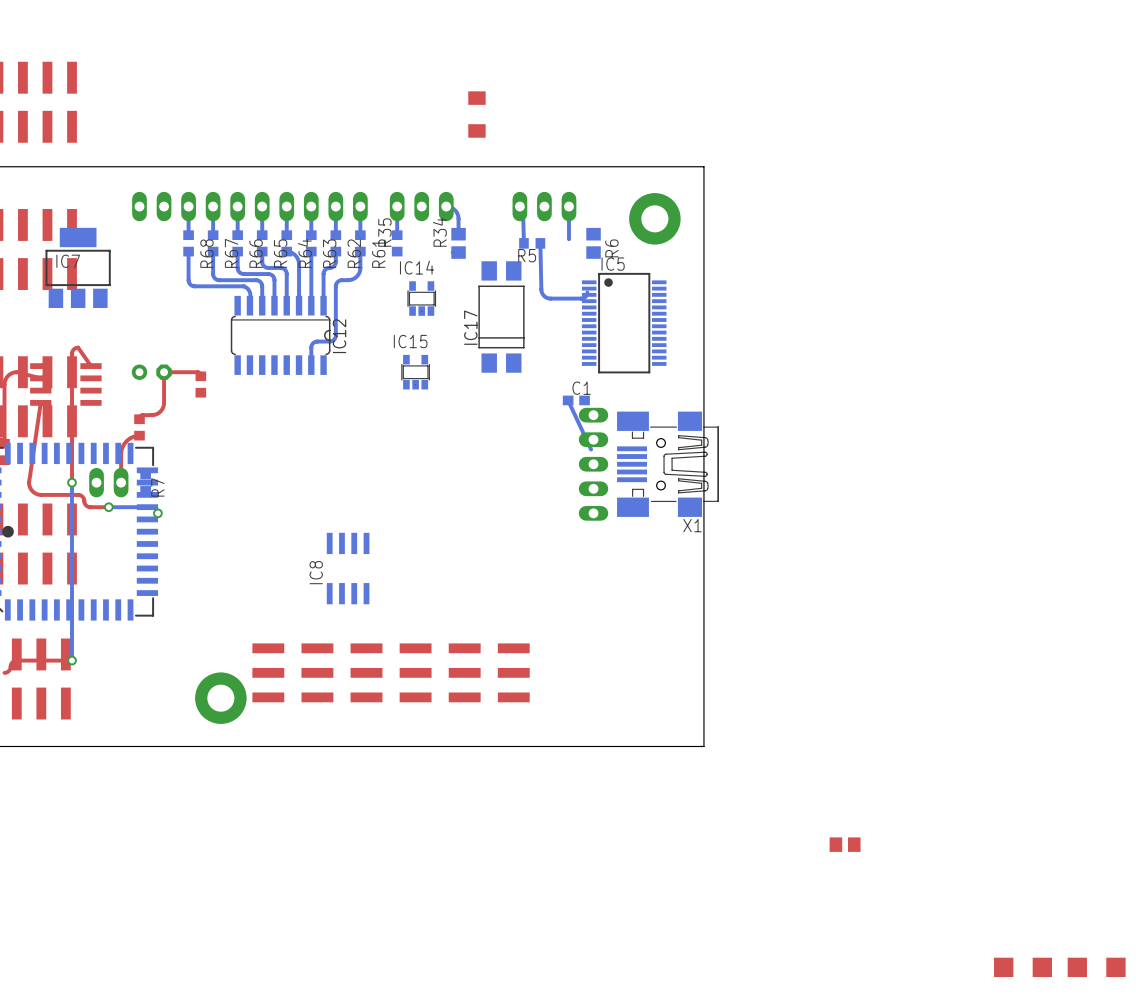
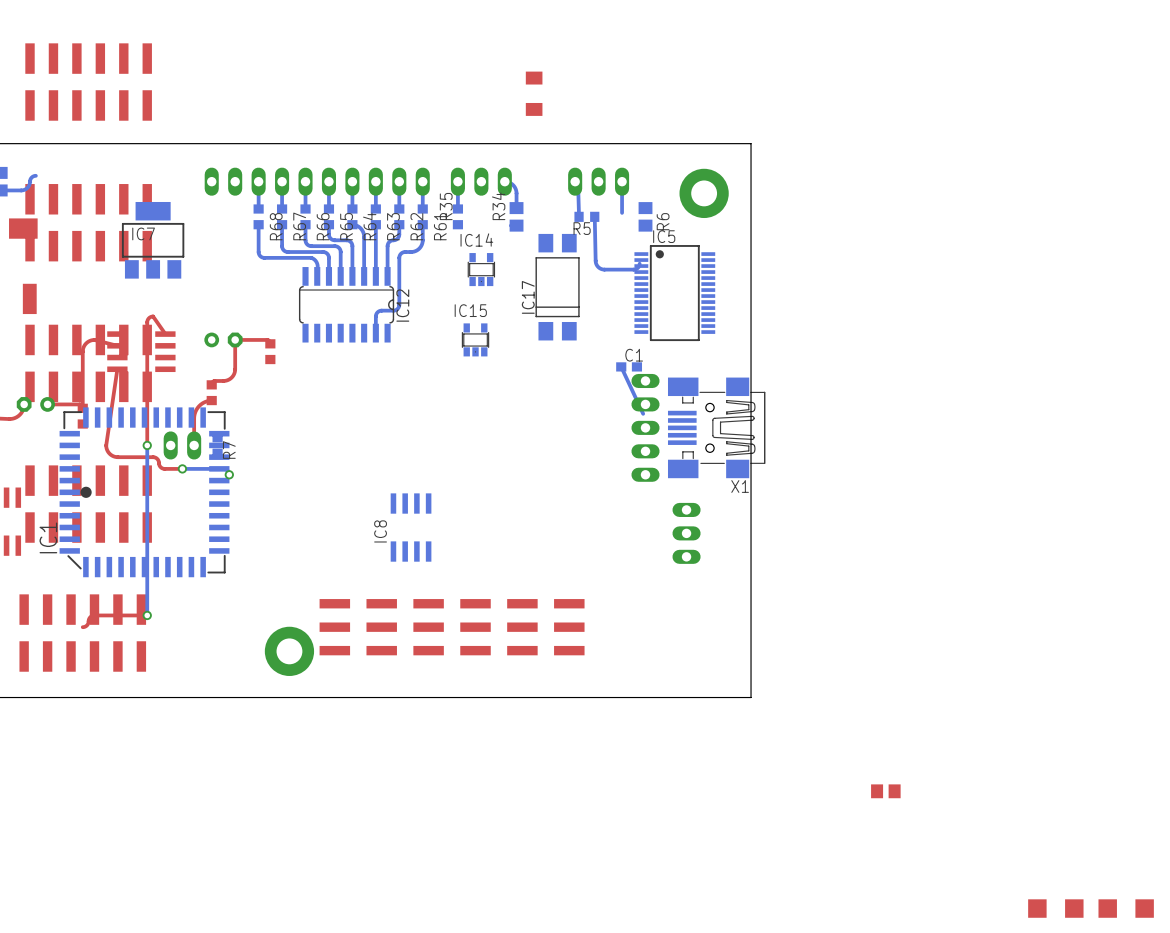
part: none -> (686, 533)

